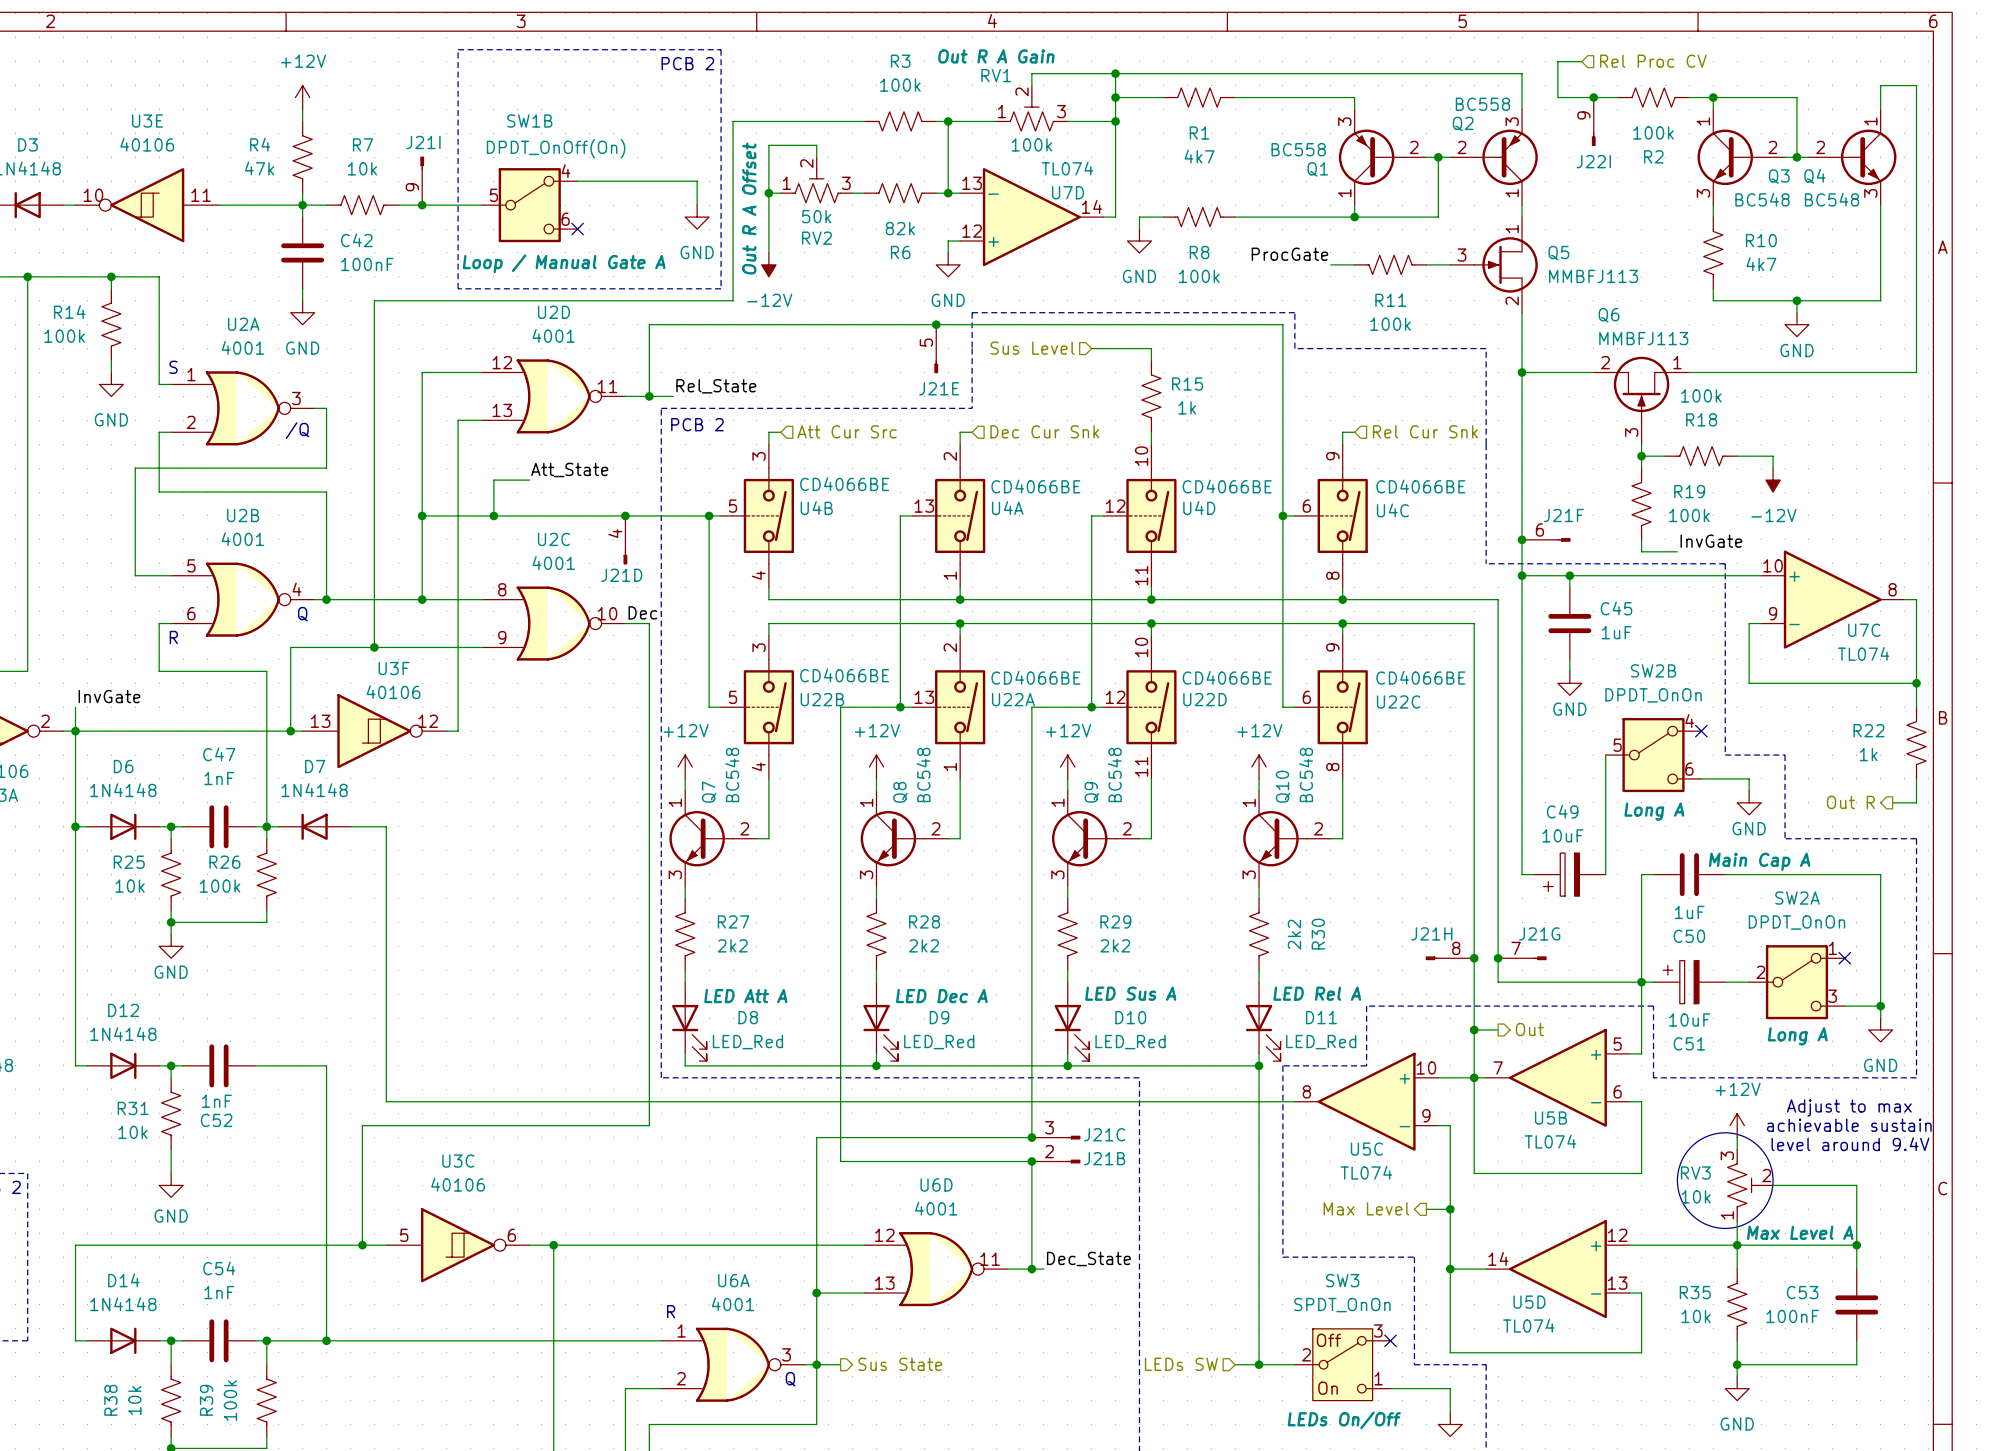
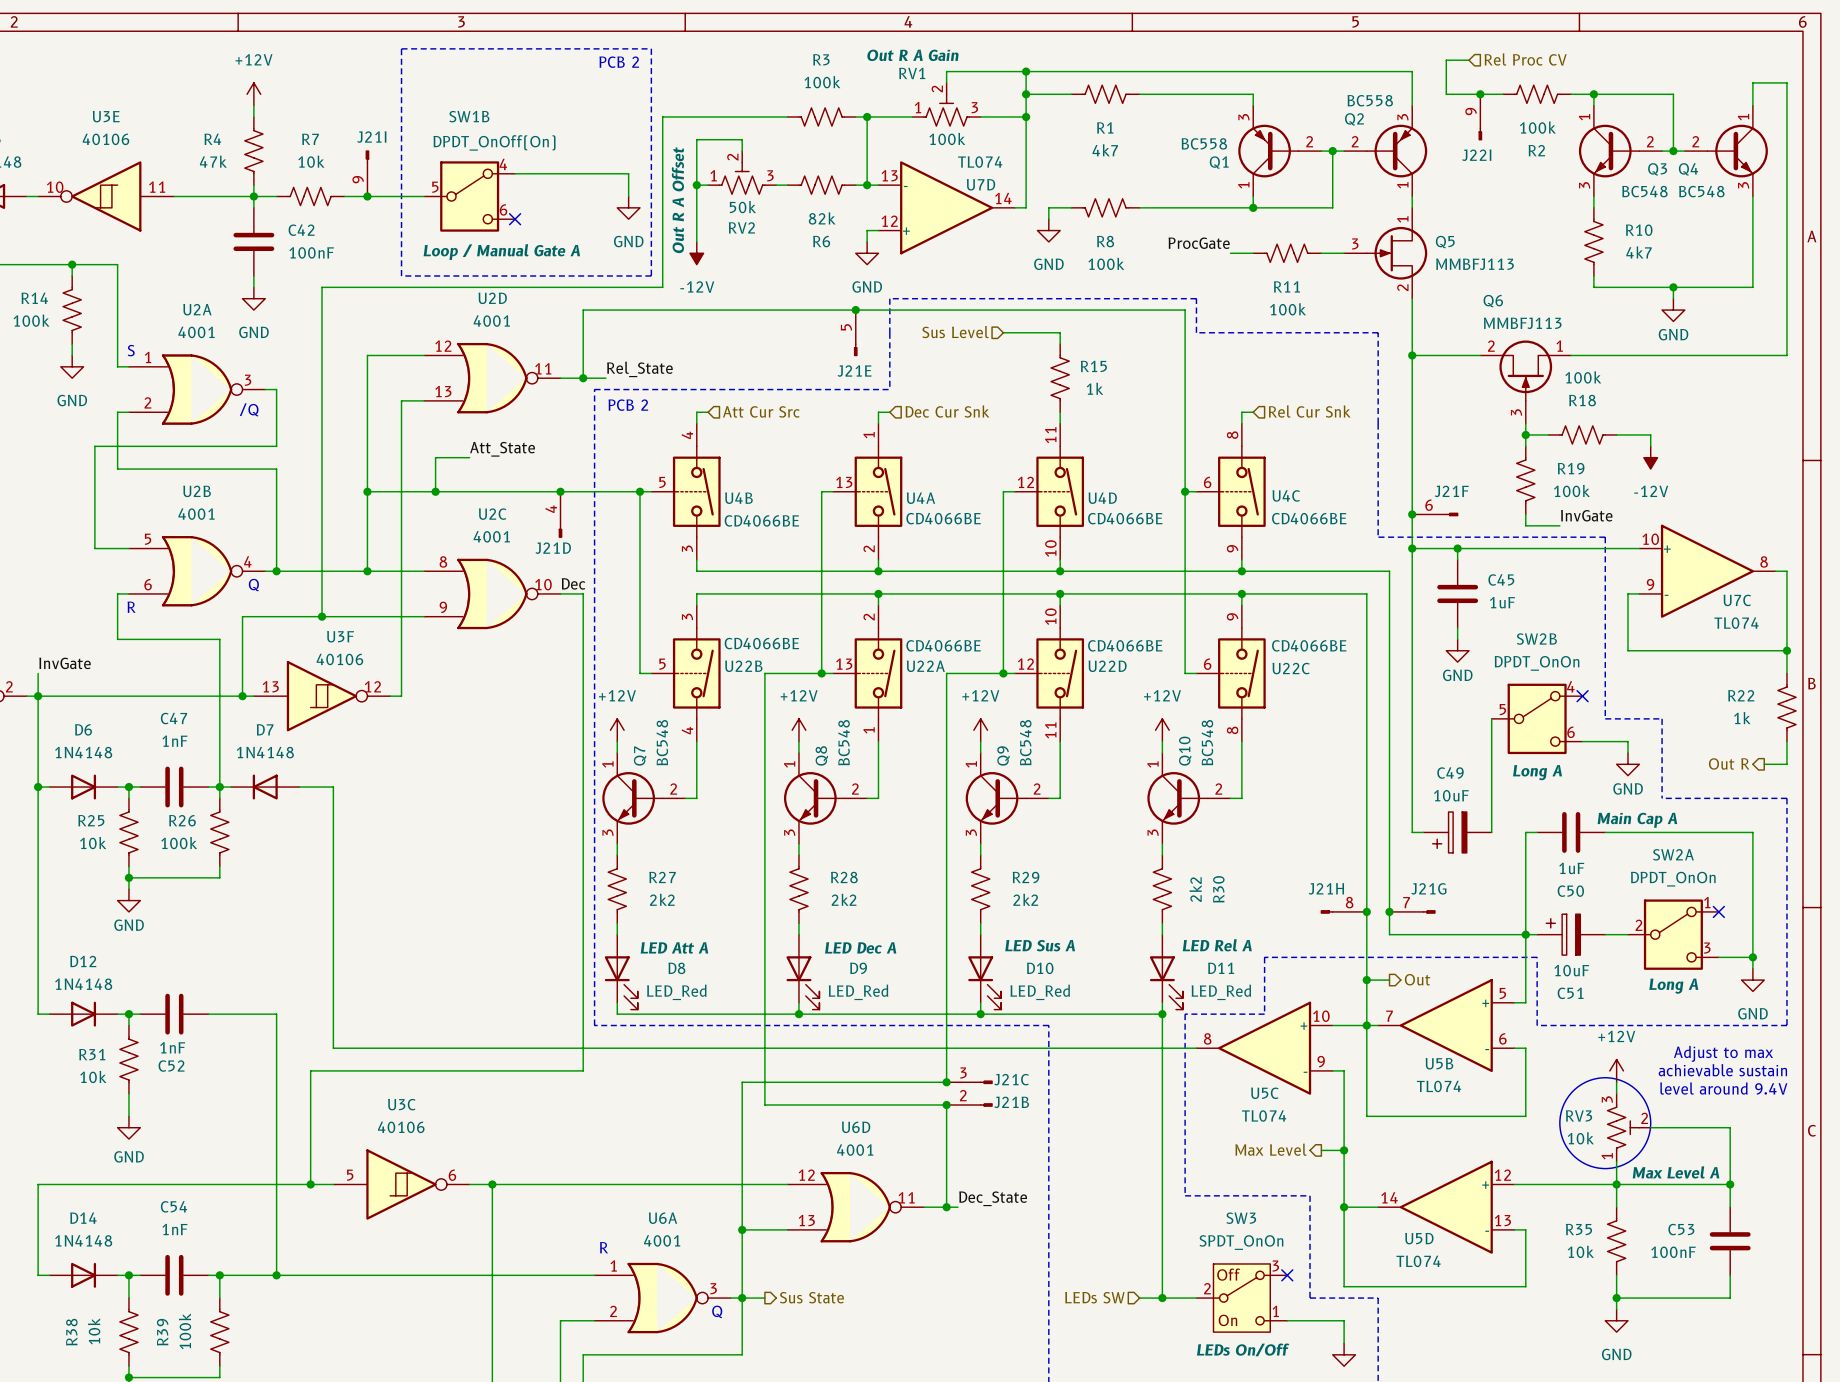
U4B flip: as is (768, 515) -> up-down (696, 491)
U4A flip: as is (960, 515) -> up-down (878, 491)
U4D flip: as is (1151, 515) -> up-down (1060, 491)
U4C flip: as is (1342, 515) -> up-down (1241, 491)

